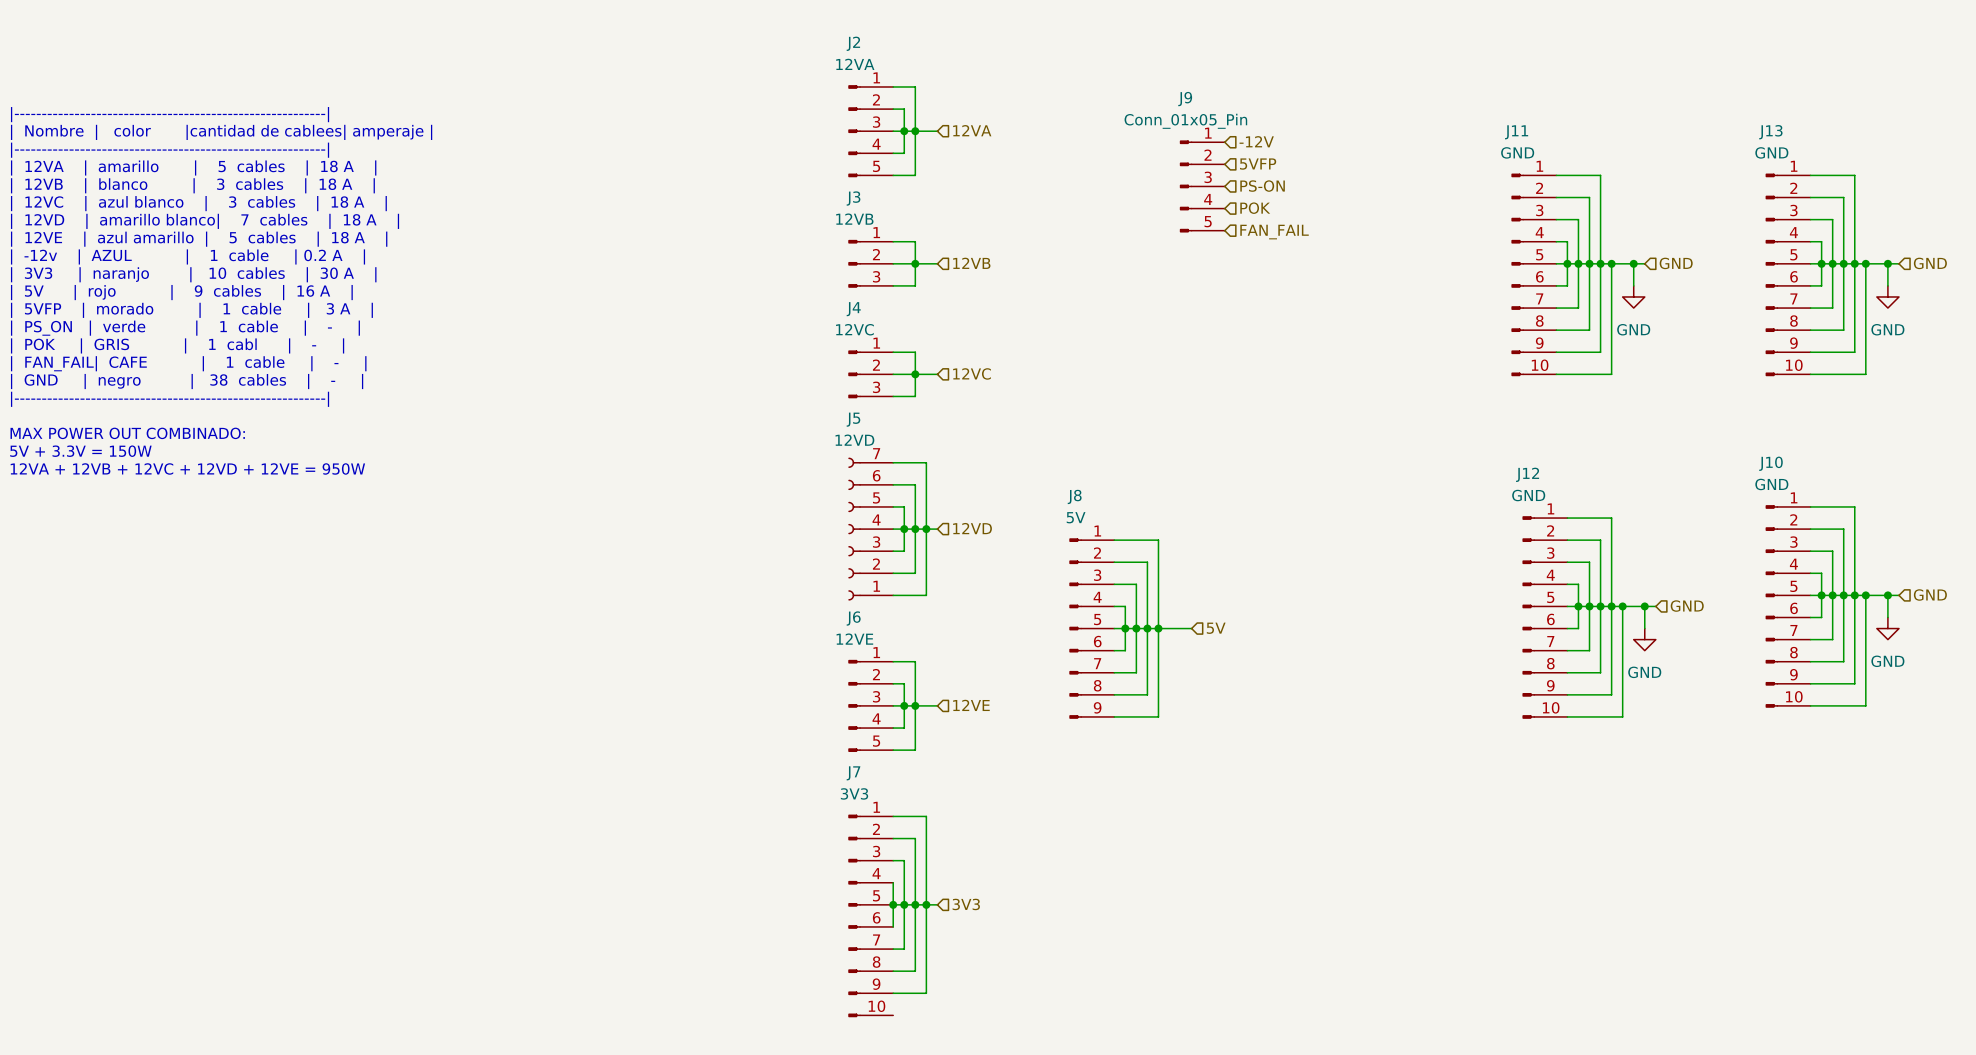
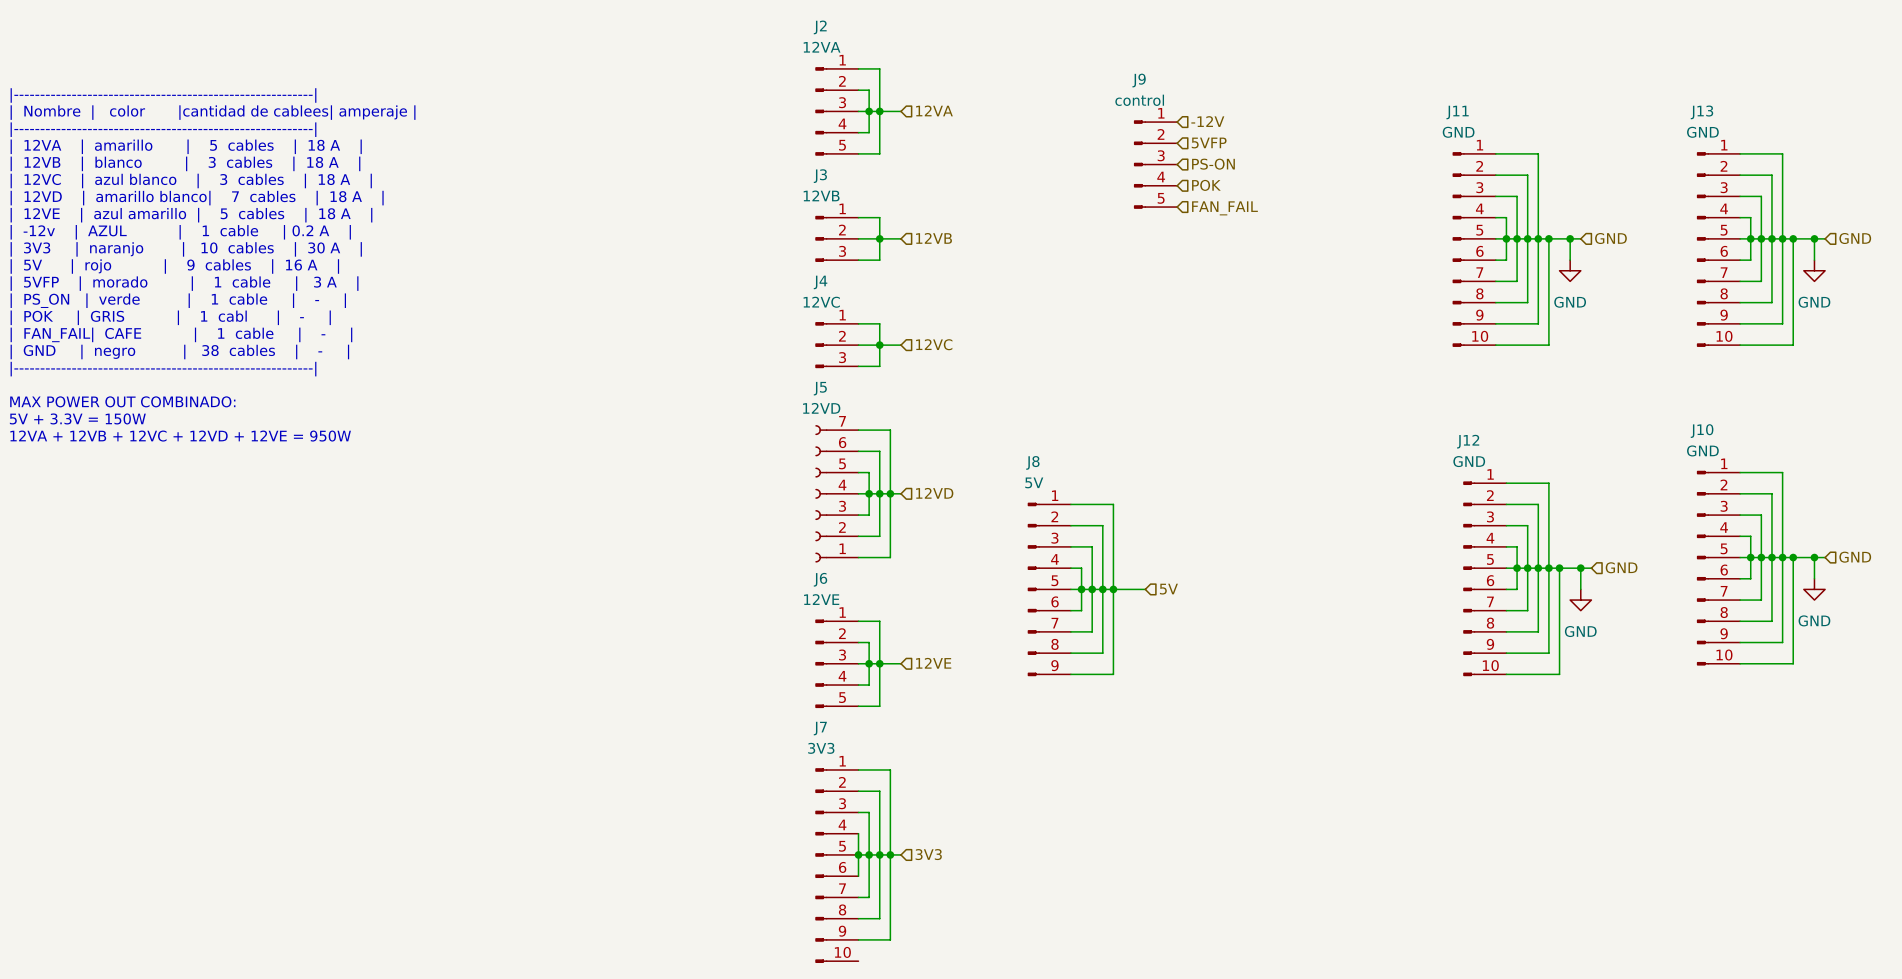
J9 value: Conn_01x05_Pin (1185, 121) -> control (1139, 100)

